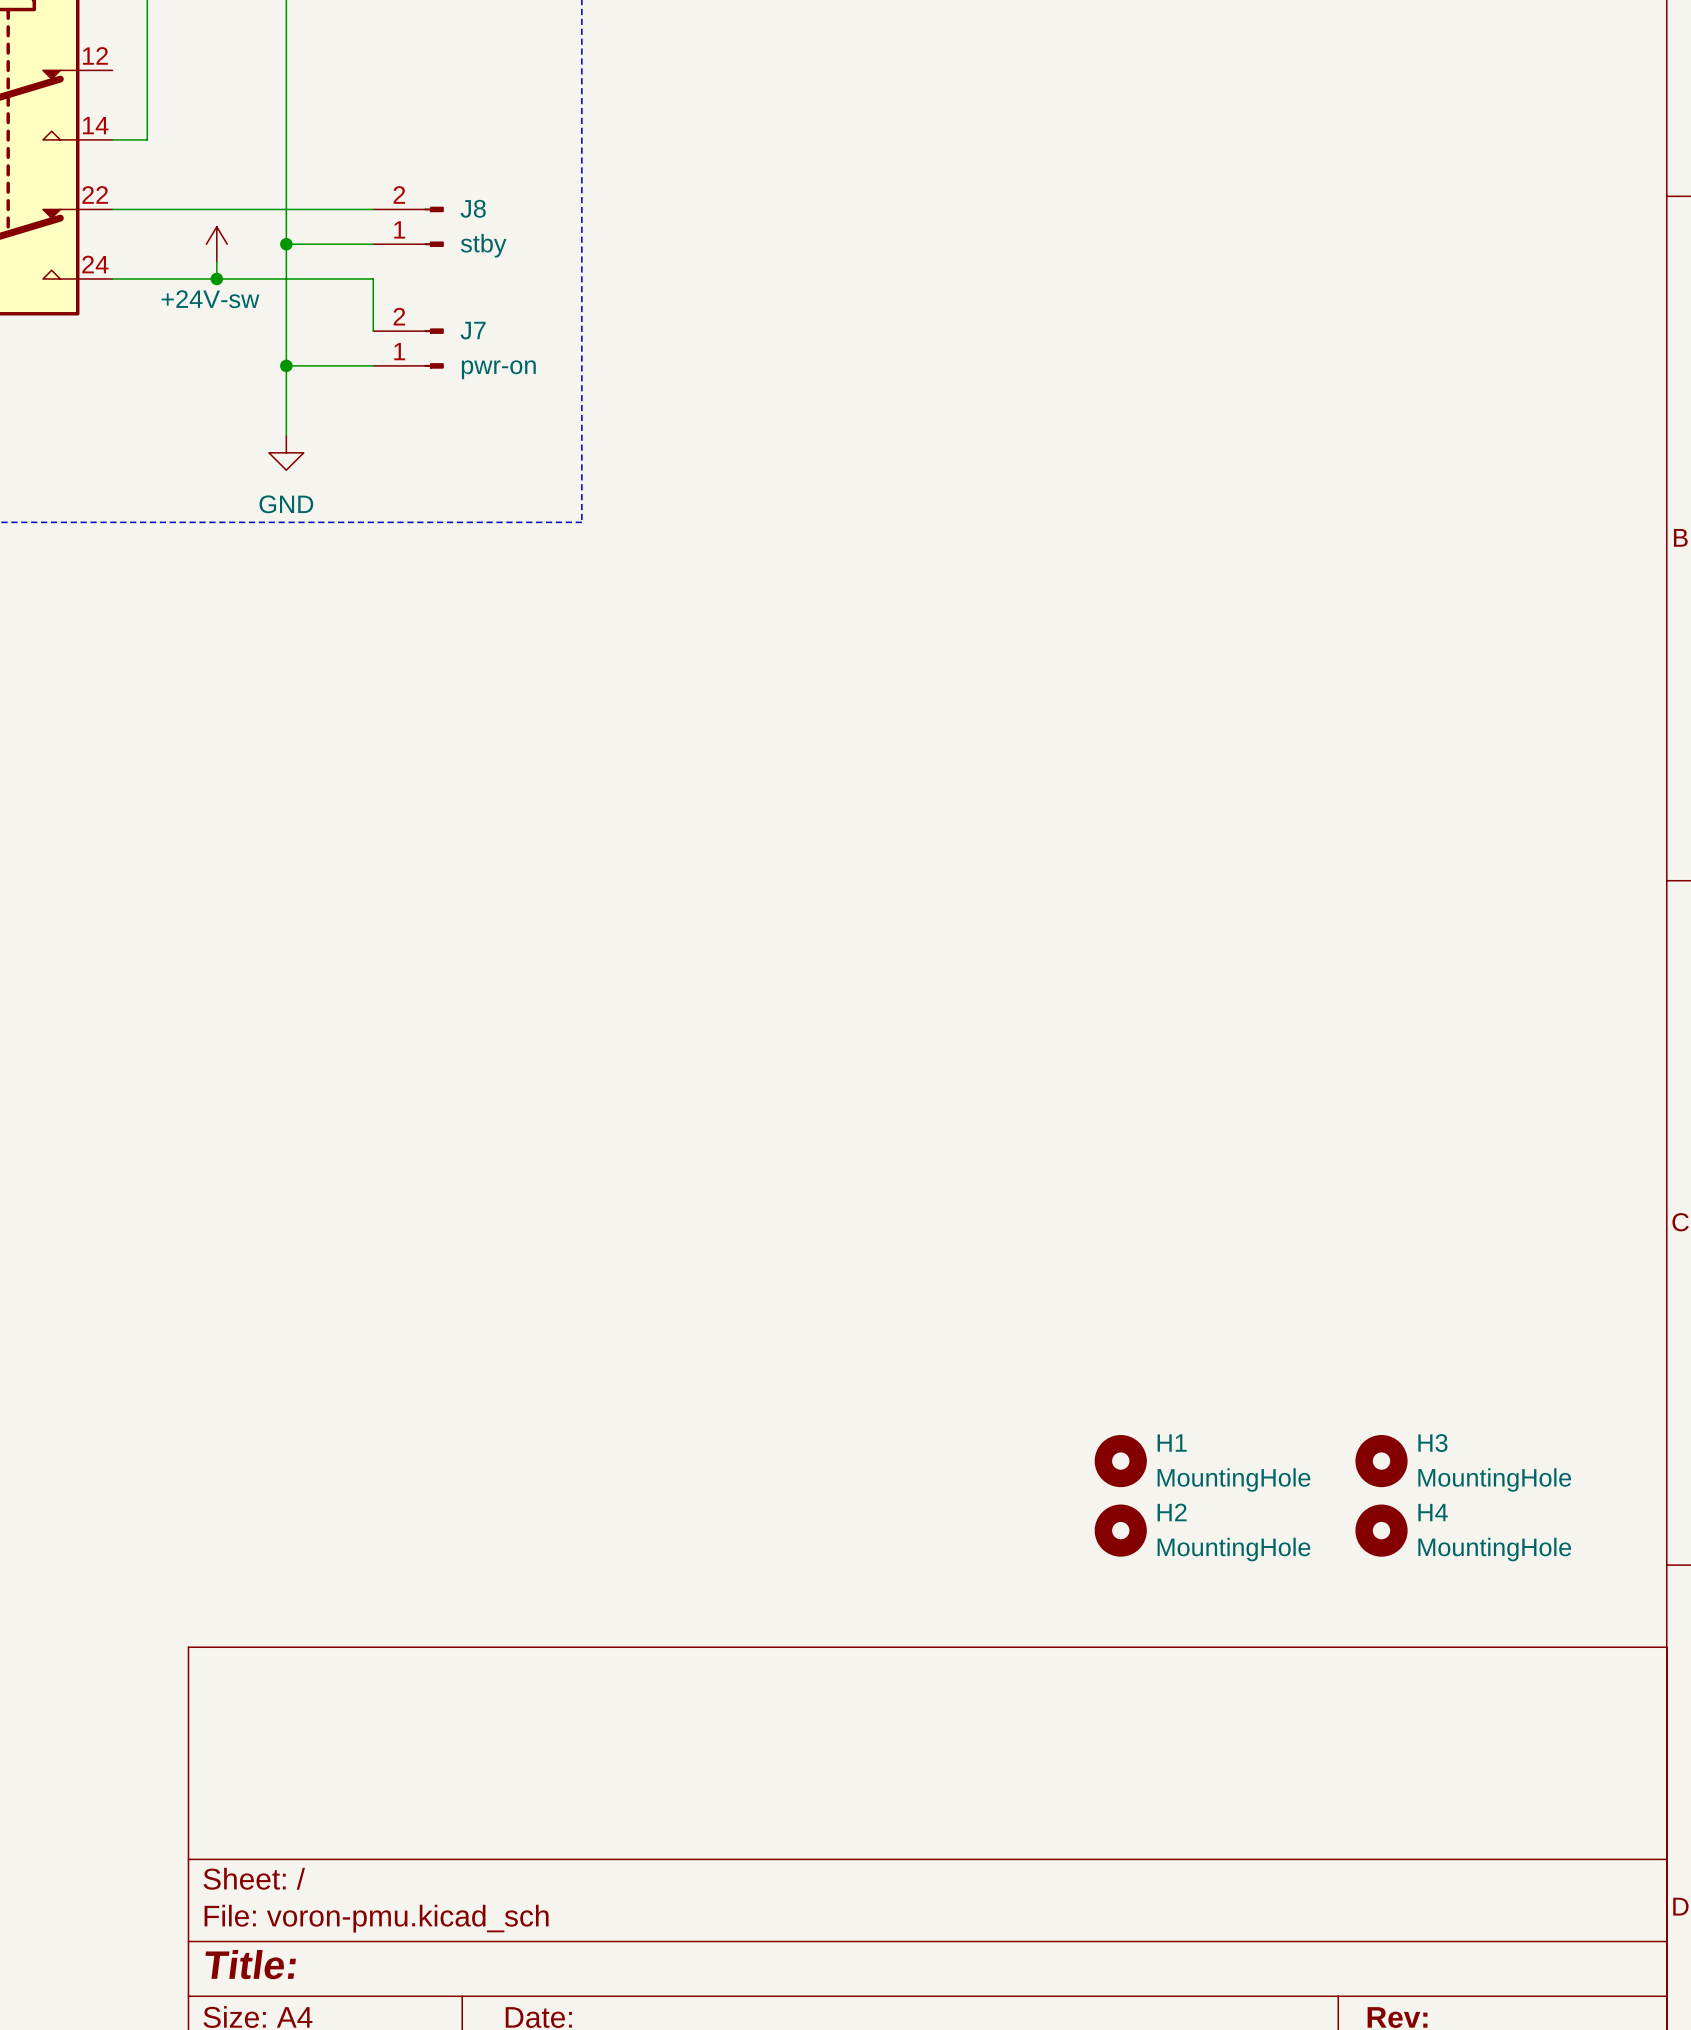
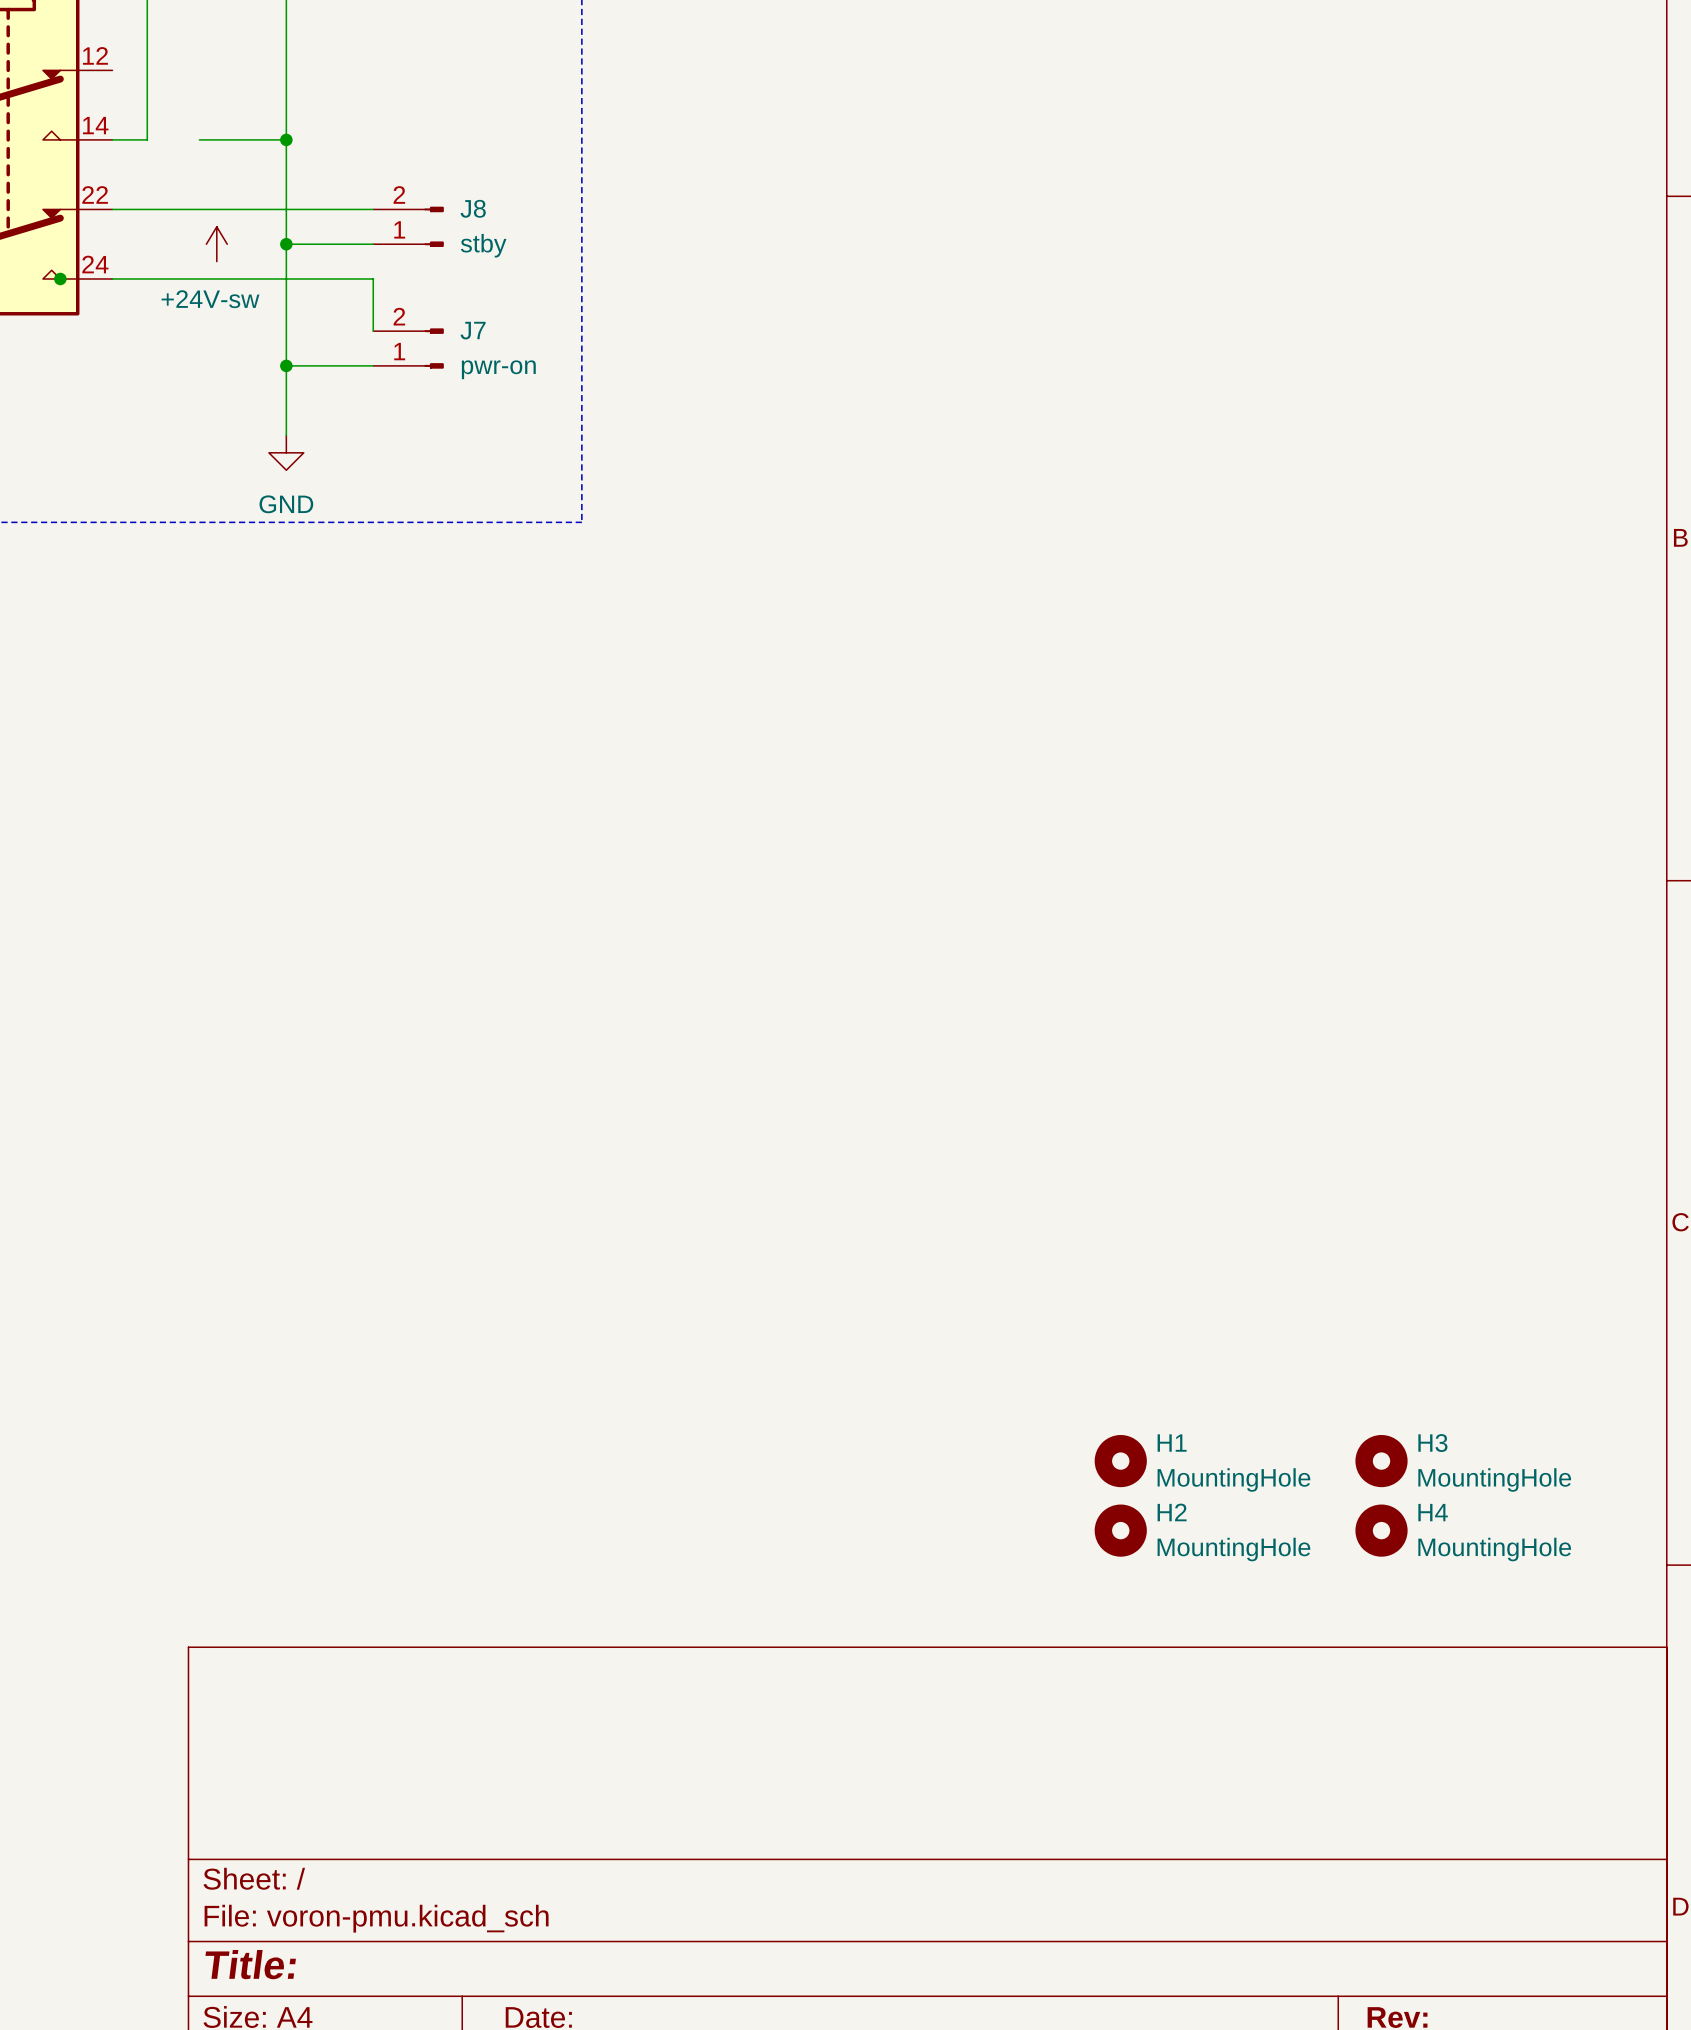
wire: none -> (199, 139) (286, 139)
junction: none -> (286, 139)
wire: (216, 261) (216, 278) -> none
junction: none -> (60, 278)
junction: (216, 278) -> none

